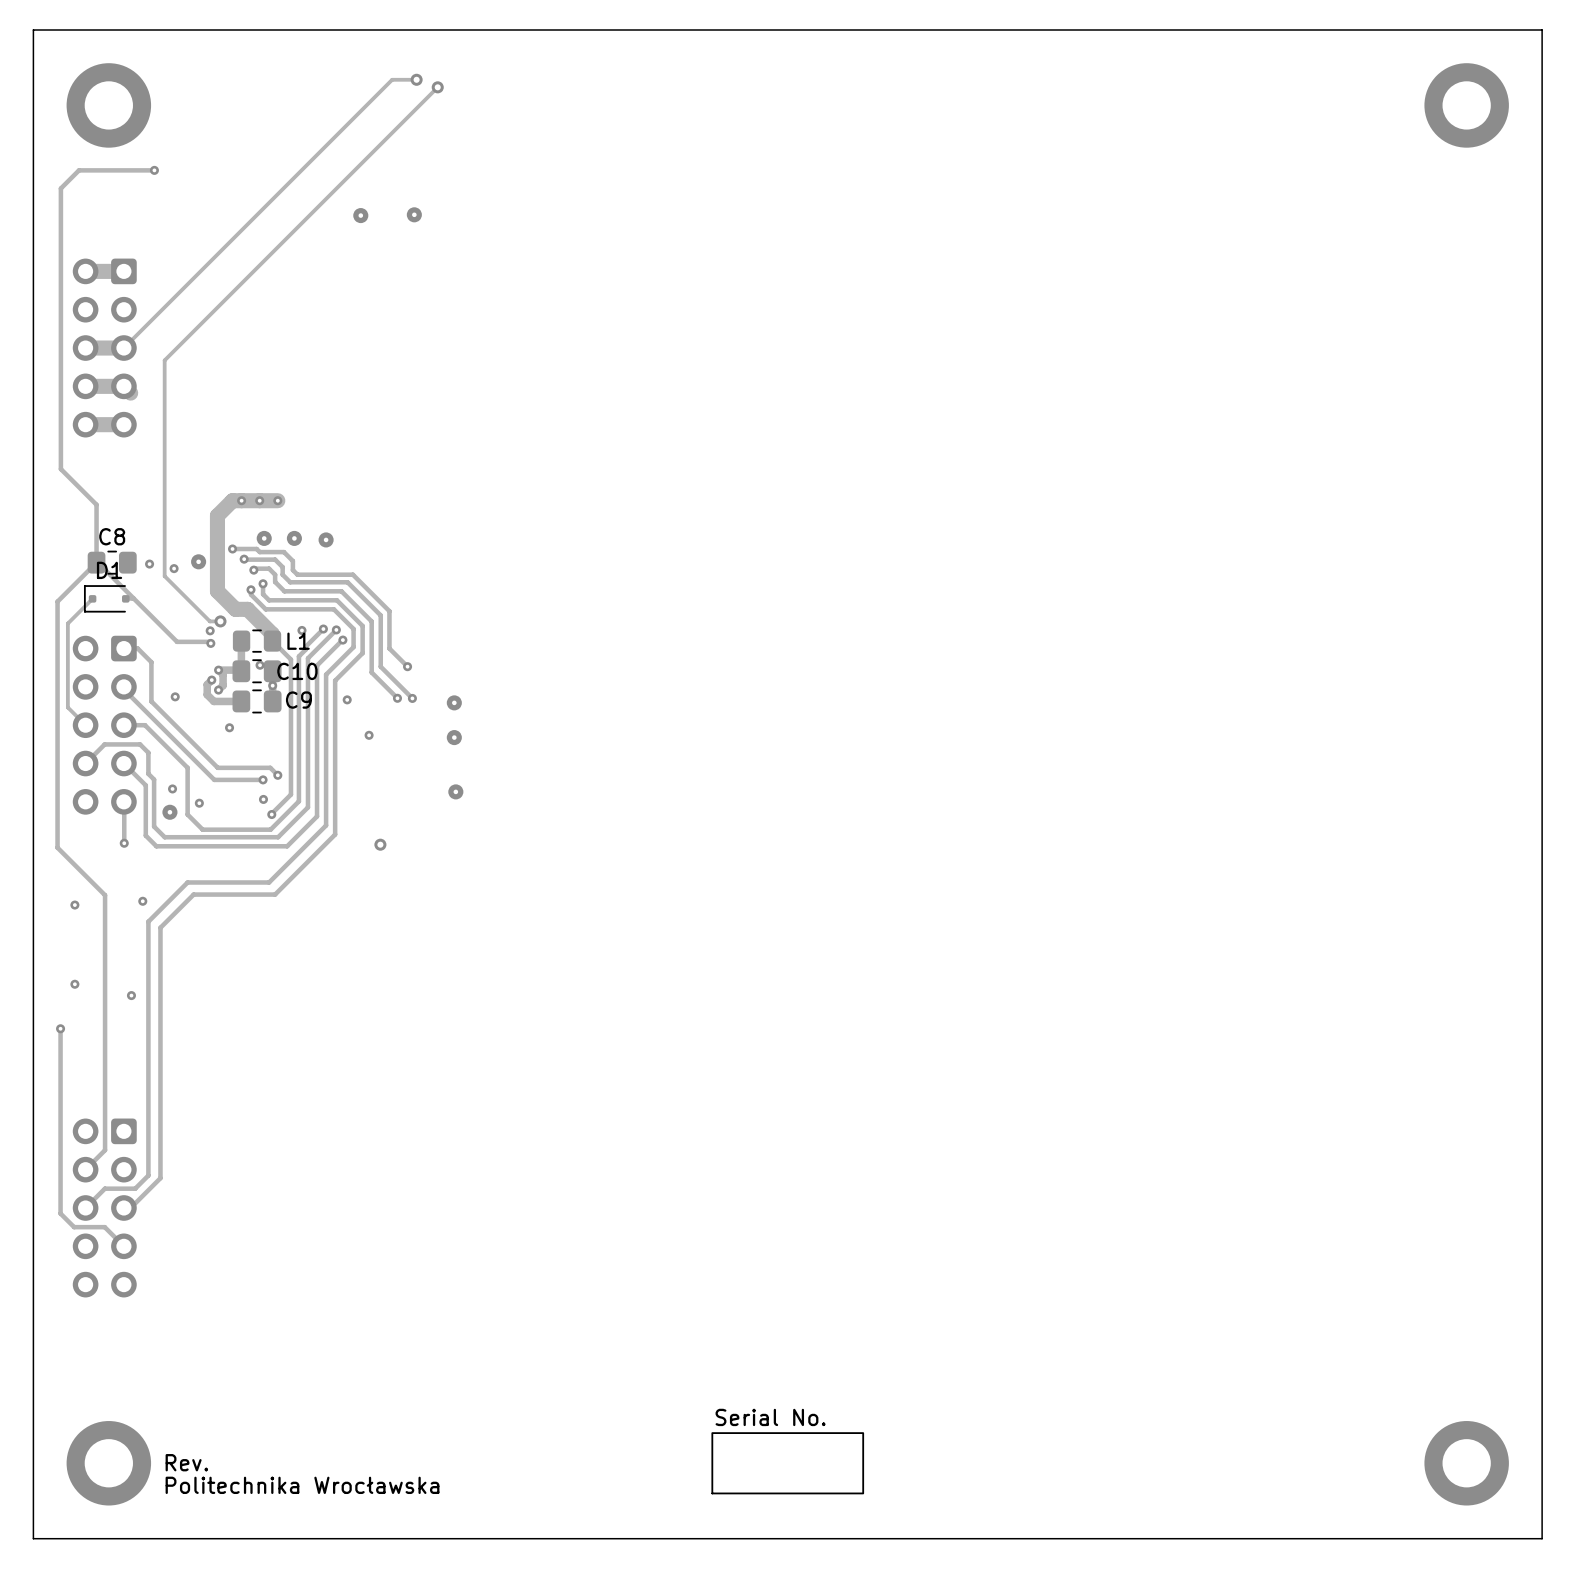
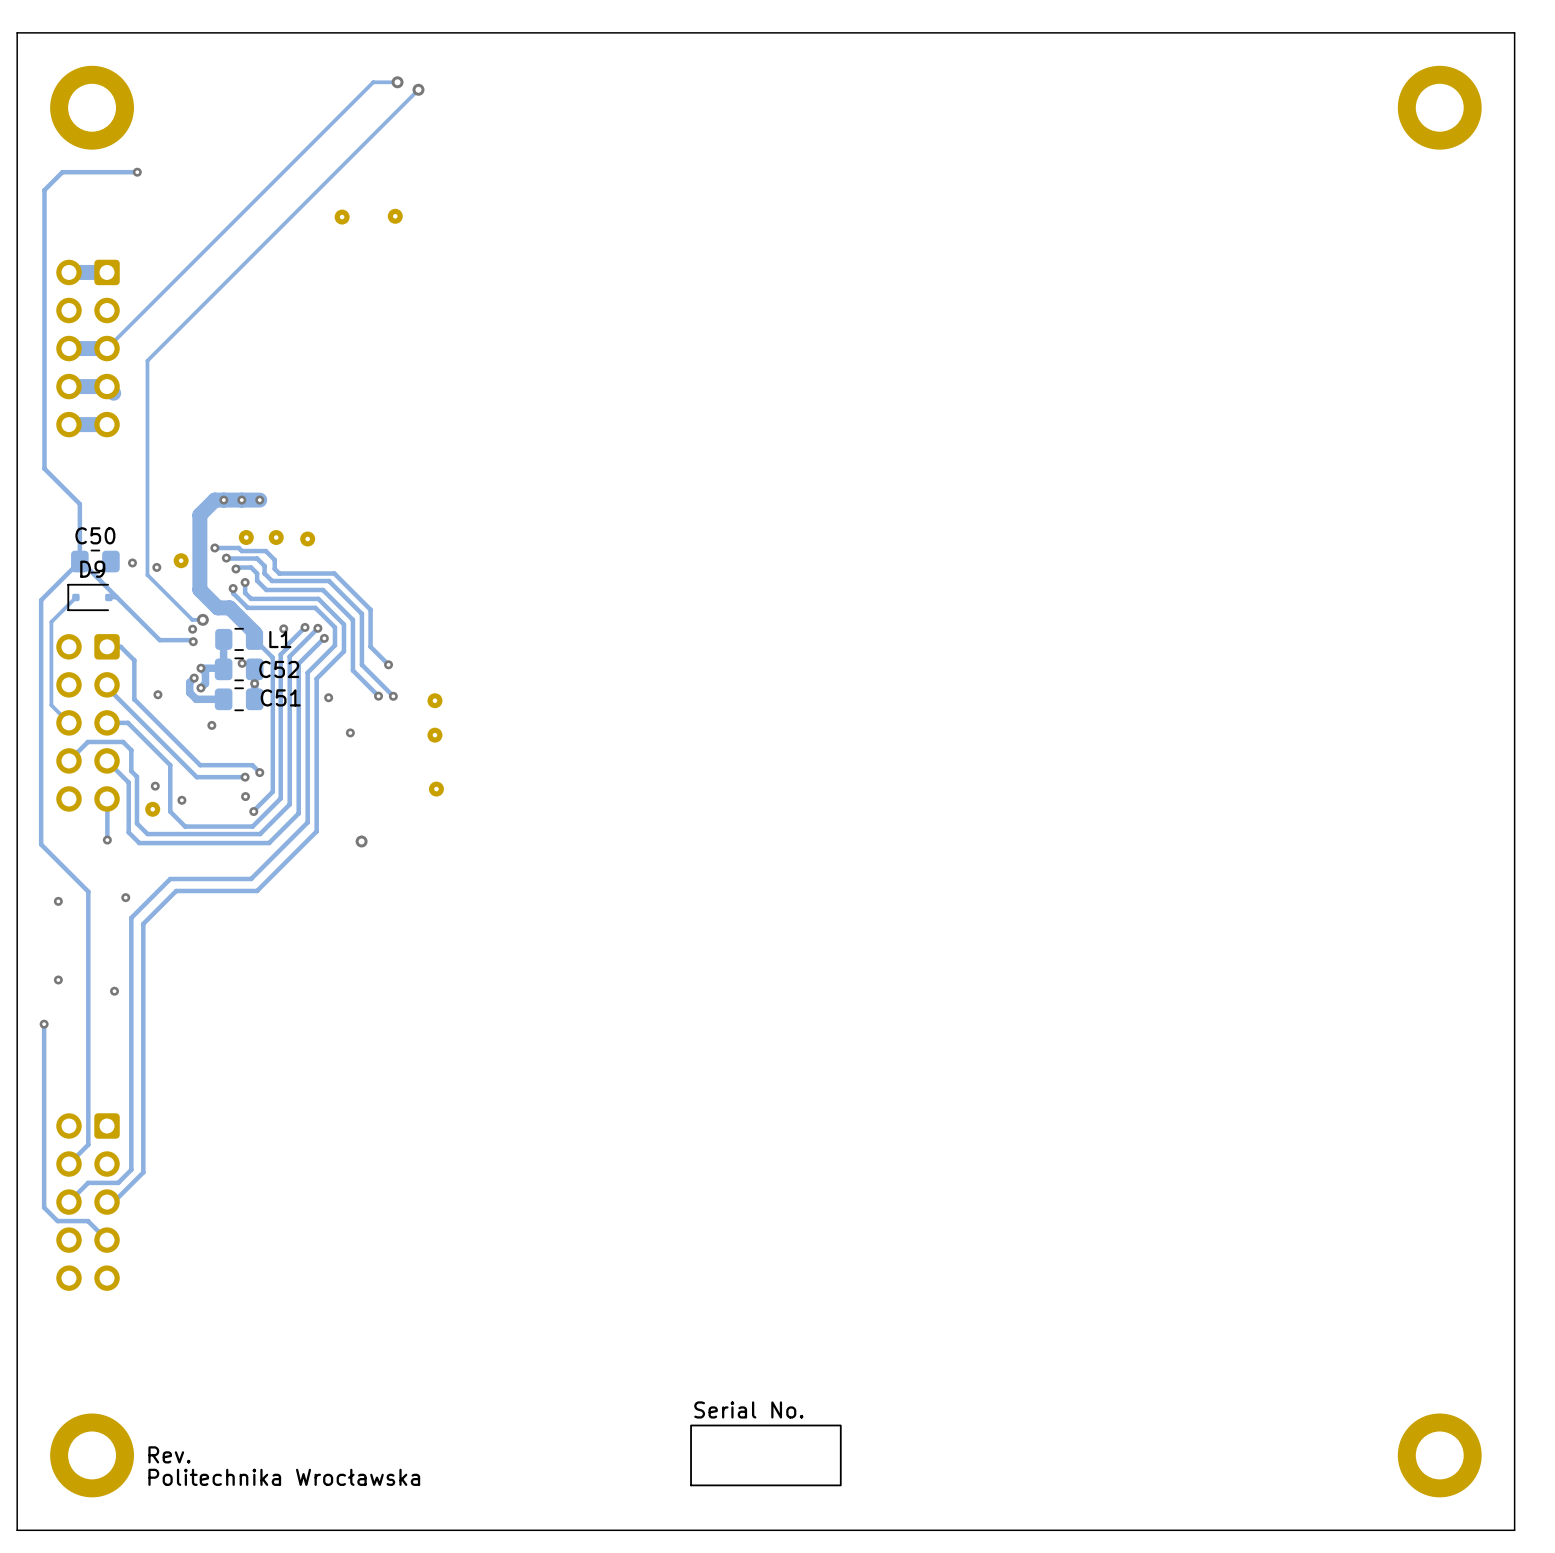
C8 name: C8 (112, 536) -> C50 (95, 535)
D1 name: D1 (109, 570) -> D9 (92, 569)
C10 name: C10 (297, 671) -> C52 (279, 669)
C9 name: C9 (298, 700) -> C51 (280, 697)

